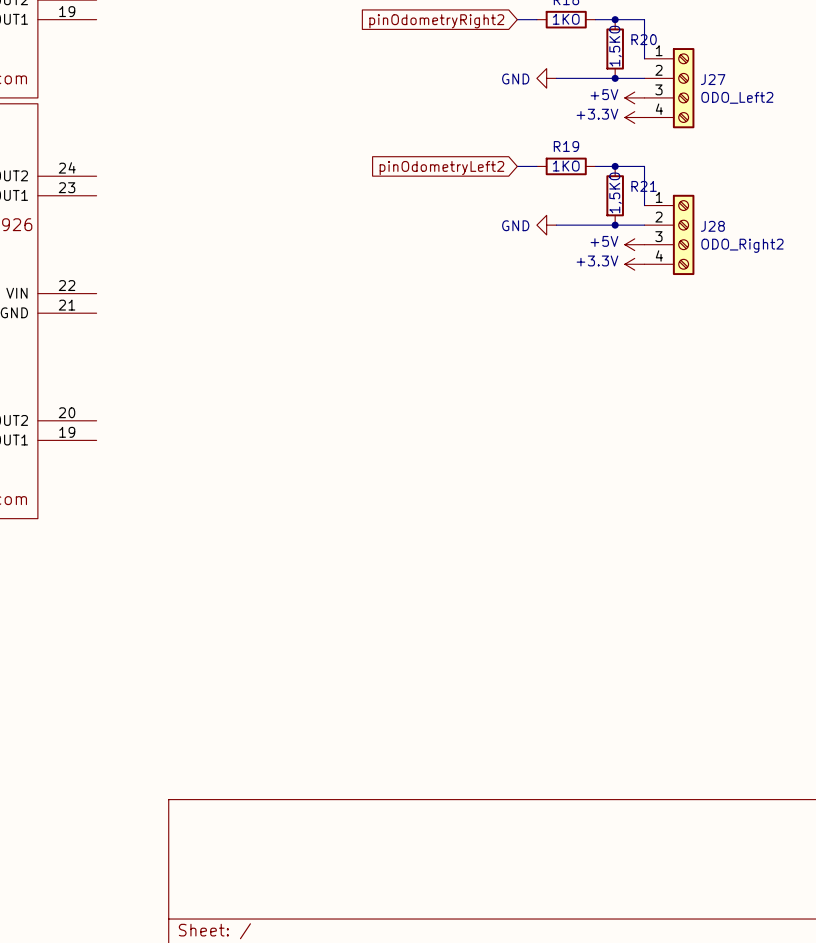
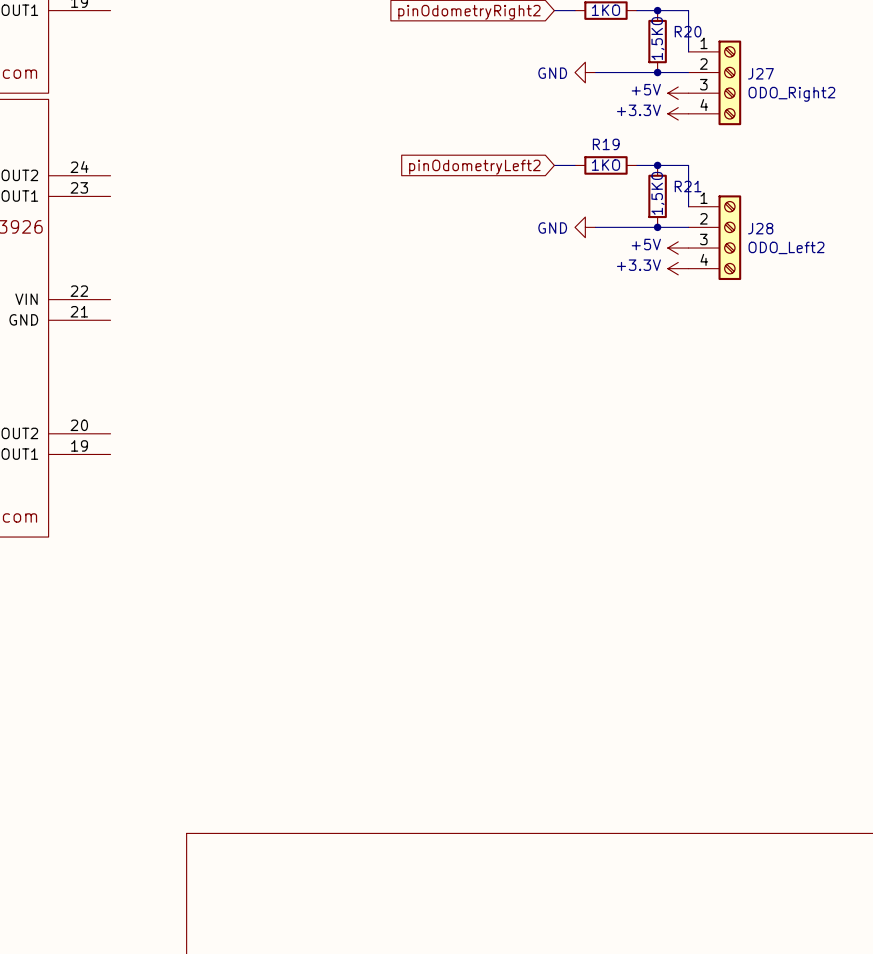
J27 value: ODO_Left2 (737, 97) -> ODO_Right2 (791, 94)
J28 value: ODO_Right2 (742, 245) -> ODO_Left2 (786, 247)

